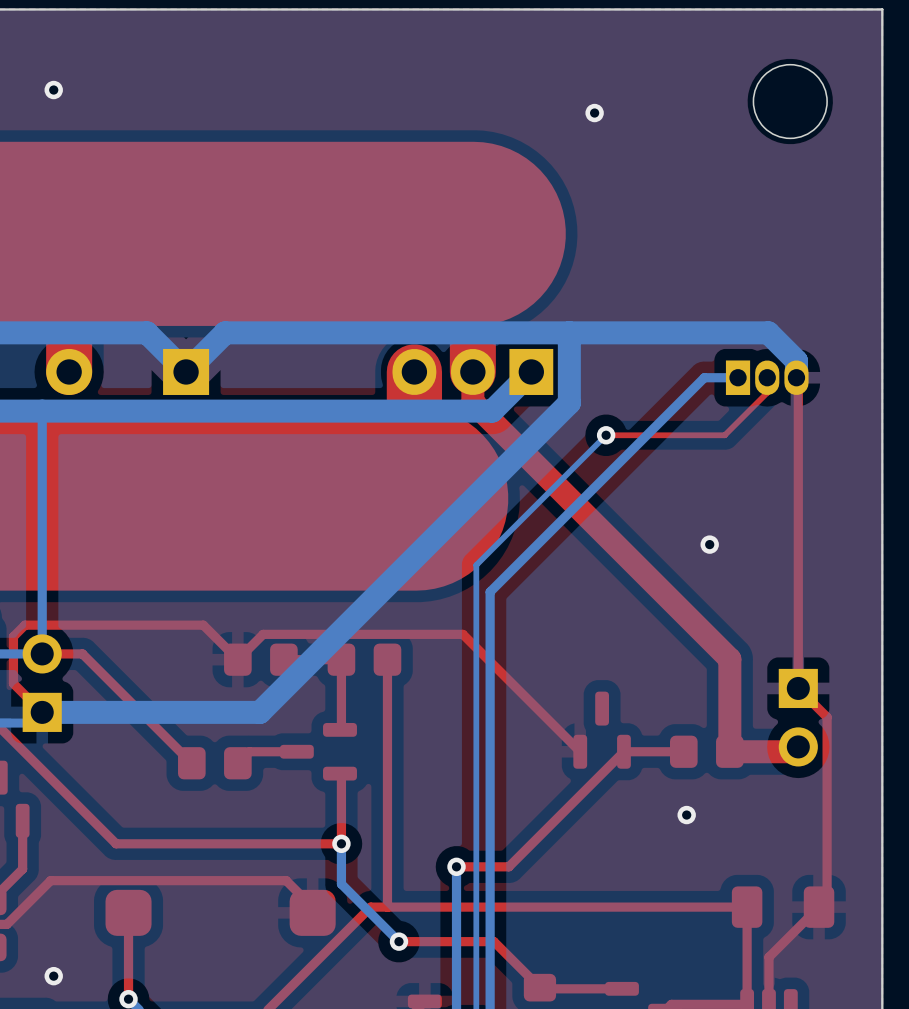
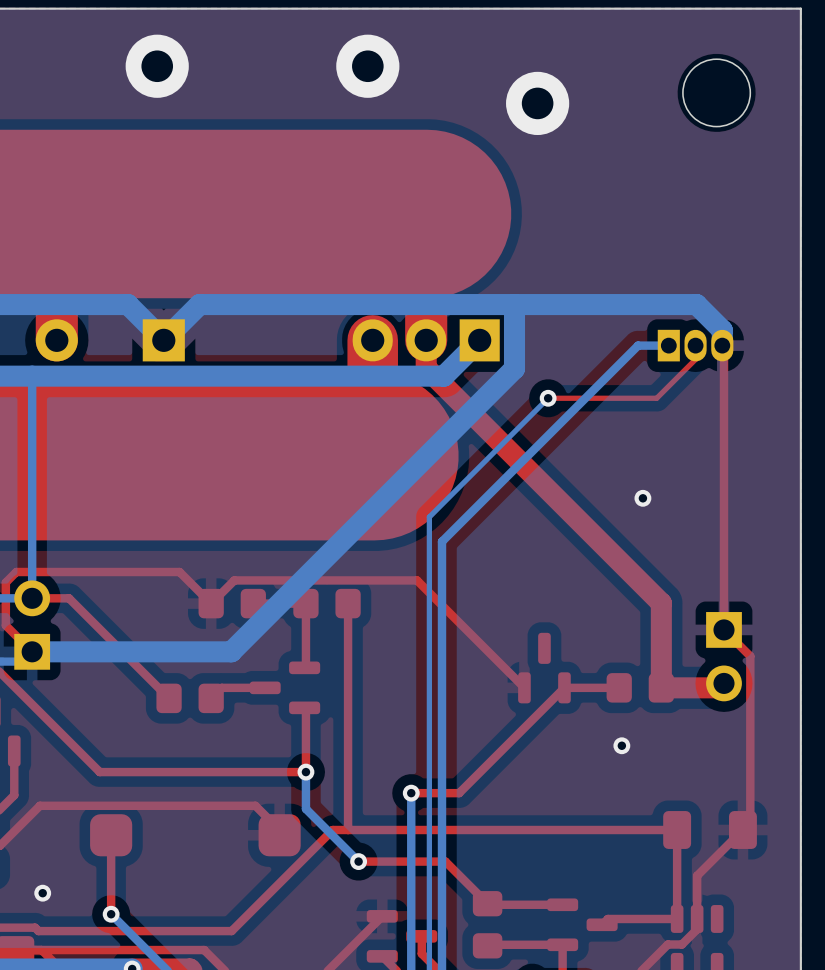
via: none -> (157, 66)
via: none -> (367, 66)
via: (53, 90) -> none
via size: [585, 103, 604, 123] -> [506, 71, 570, 136]

